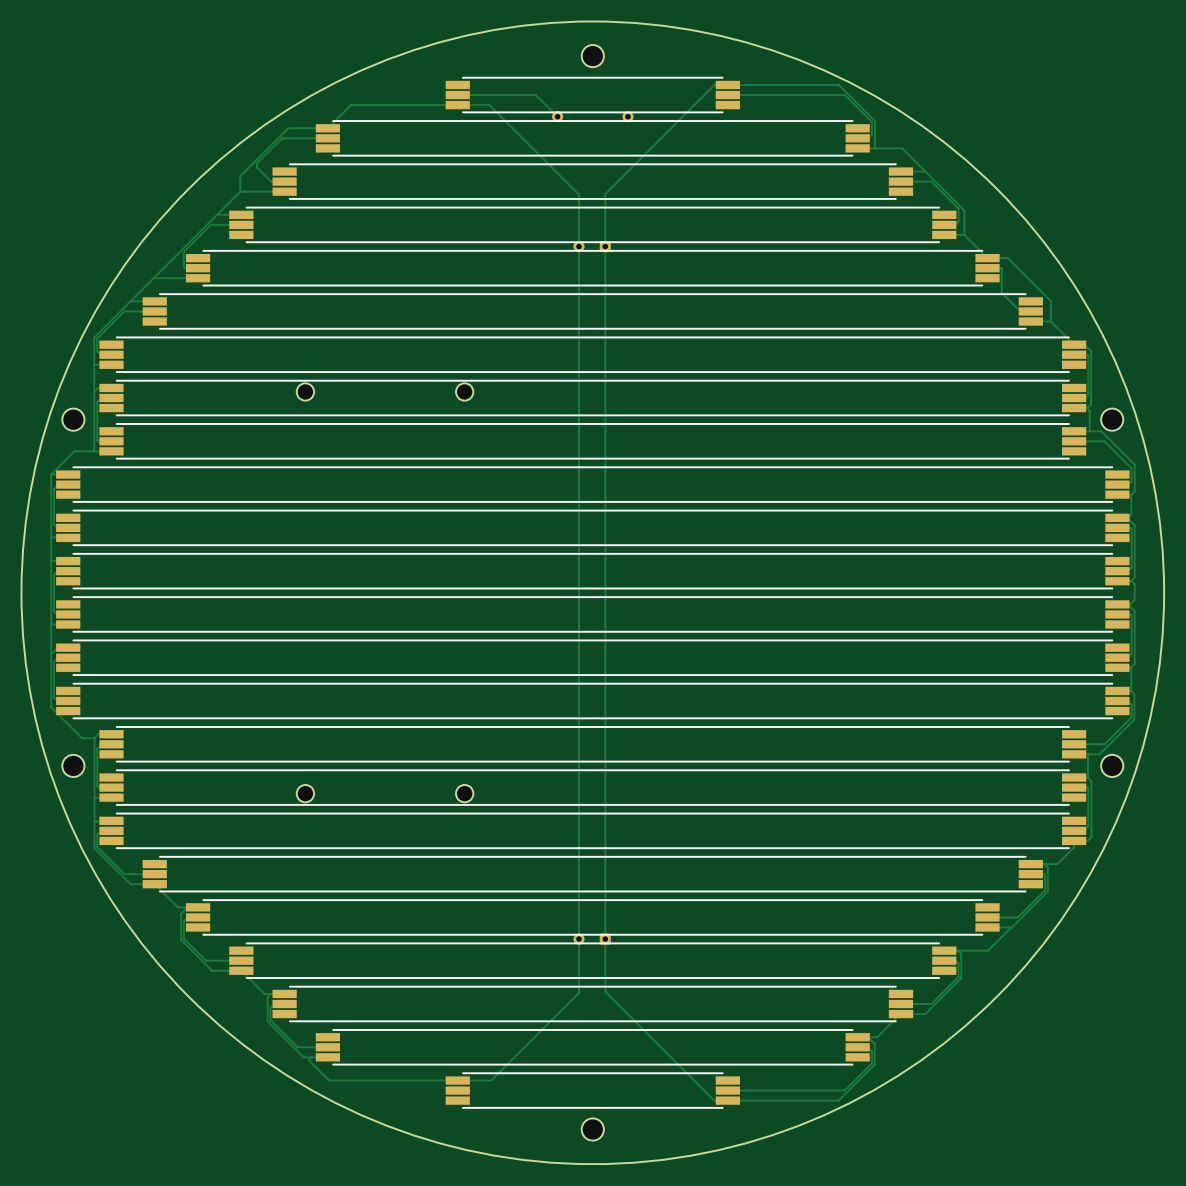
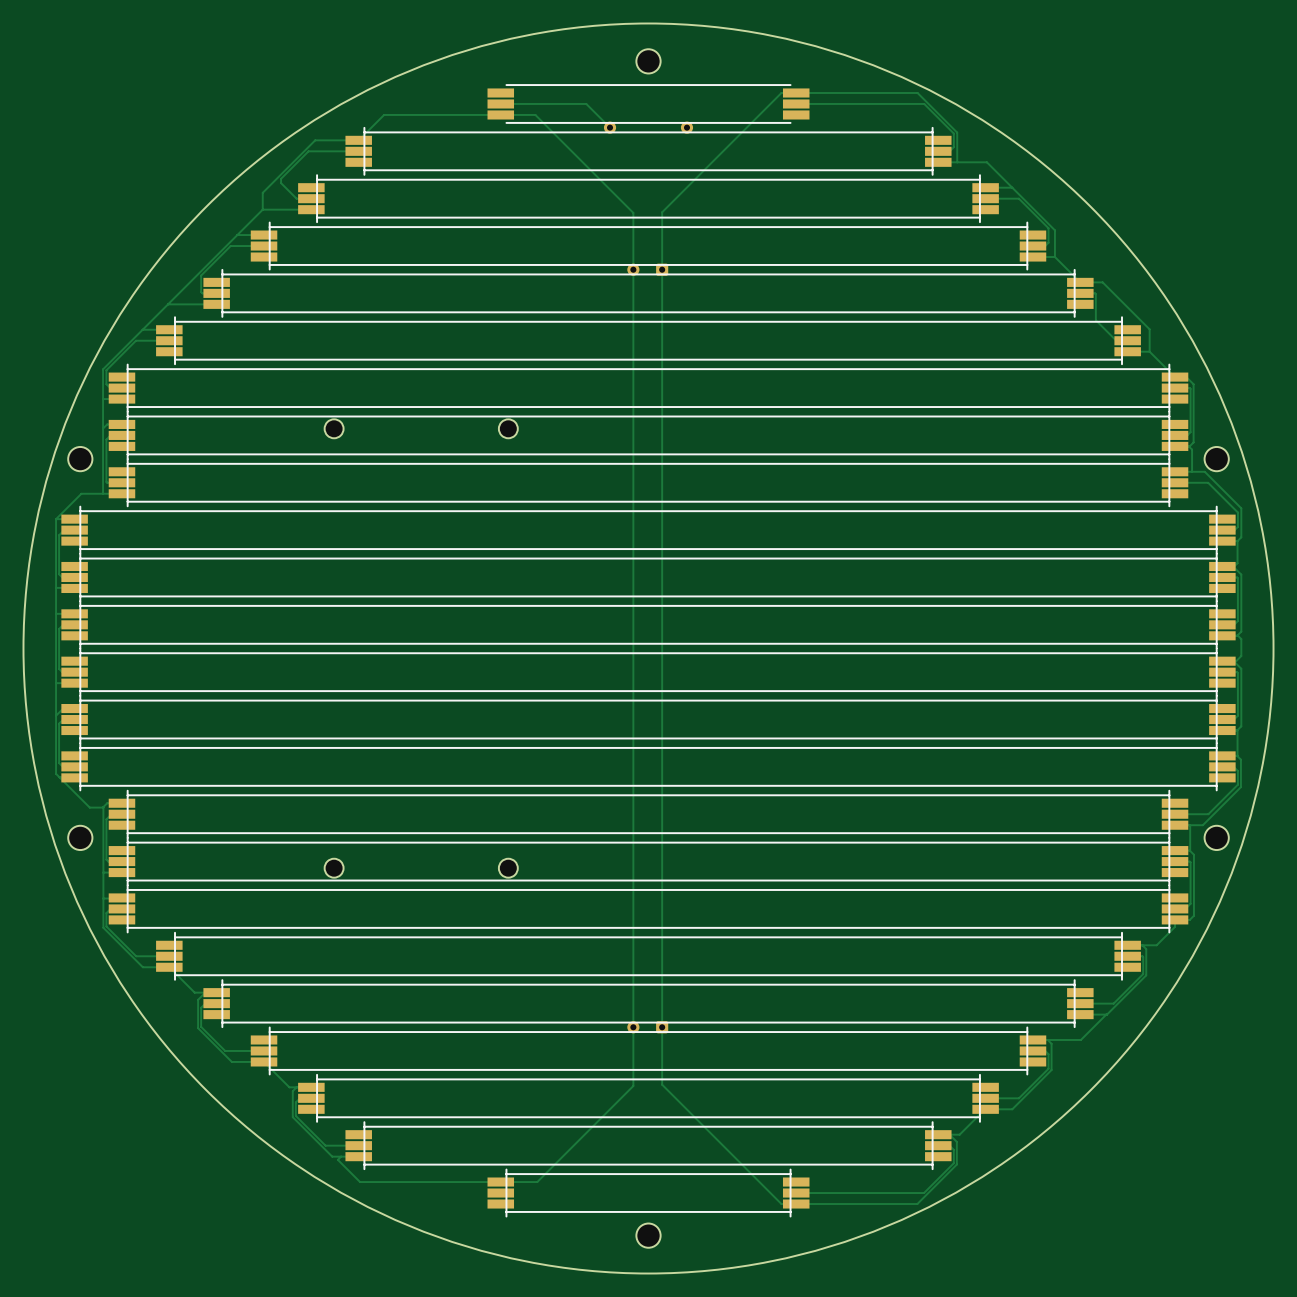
part footprint: [315, 120, 870, 157] -> [345, 127, 952, 176]
part footprint: [272, 163, 914, 200] -> [298, 174, 999, 223]
part footprint: [229, 206, 957, 243] -> [250, 221, 1047, 271]
part footprint: [185, 250, 1000, 287] -> [203, 269, 1094, 318]
part footprint: [142, 293, 1043, 330] -> [156, 316, 1141, 365]
part footprint: [99, 336, 1087, 373] -> [108, 363, 1189, 413]
part footprint: [99, 380, 1087, 417] -> [108, 411, 1189, 460]
part footprint: [99, 423, 1087, 460] -> [108, 458, 1189, 508]
part footprint: [56, 466, 1130, 503] -> [61, 505, 1236, 555]
part footprint: [56, 509, 1130, 546] -> [61, 553, 1236, 602]
part footprint: [56, 553, 1130, 590] -> [61, 600, 1236, 650]
part footprint: [56, 596, 1130, 633] -> [61, 647, 1236, 697]
part footprint: [56, 639, 1130, 676] -> [61, 695, 1236, 744]
part footprint: [56, 683, 1130, 720] -> [61, 742, 1236, 792]
part footprint: [99, 726, 1087, 763] -> [108, 789, 1189, 839]
part footprint: [99, 769, 1087, 806] -> [108, 837, 1189, 886]
part footprint: [99, 812, 1087, 849] -> [108, 884, 1189, 934]
part footprint: [142, 856, 1043, 893] -> [156, 932, 1141, 981]
part footprint: [185, 899, 1000, 936] -> [203, 979, 1094, 1028]
part footprint: [229, 942, 957, 979] -> [250, 1026, 1047, 1076]
part footprint: [272, 985, 914, 1023] -> [298, 1074, 999, 1123]
part footprint: [315, 1029, 870, 1066] -> [345, 1121, 952, 1170]
part footprint: [445, 1072, 740, 1109] -> [487, 1168, 810, 1218]

